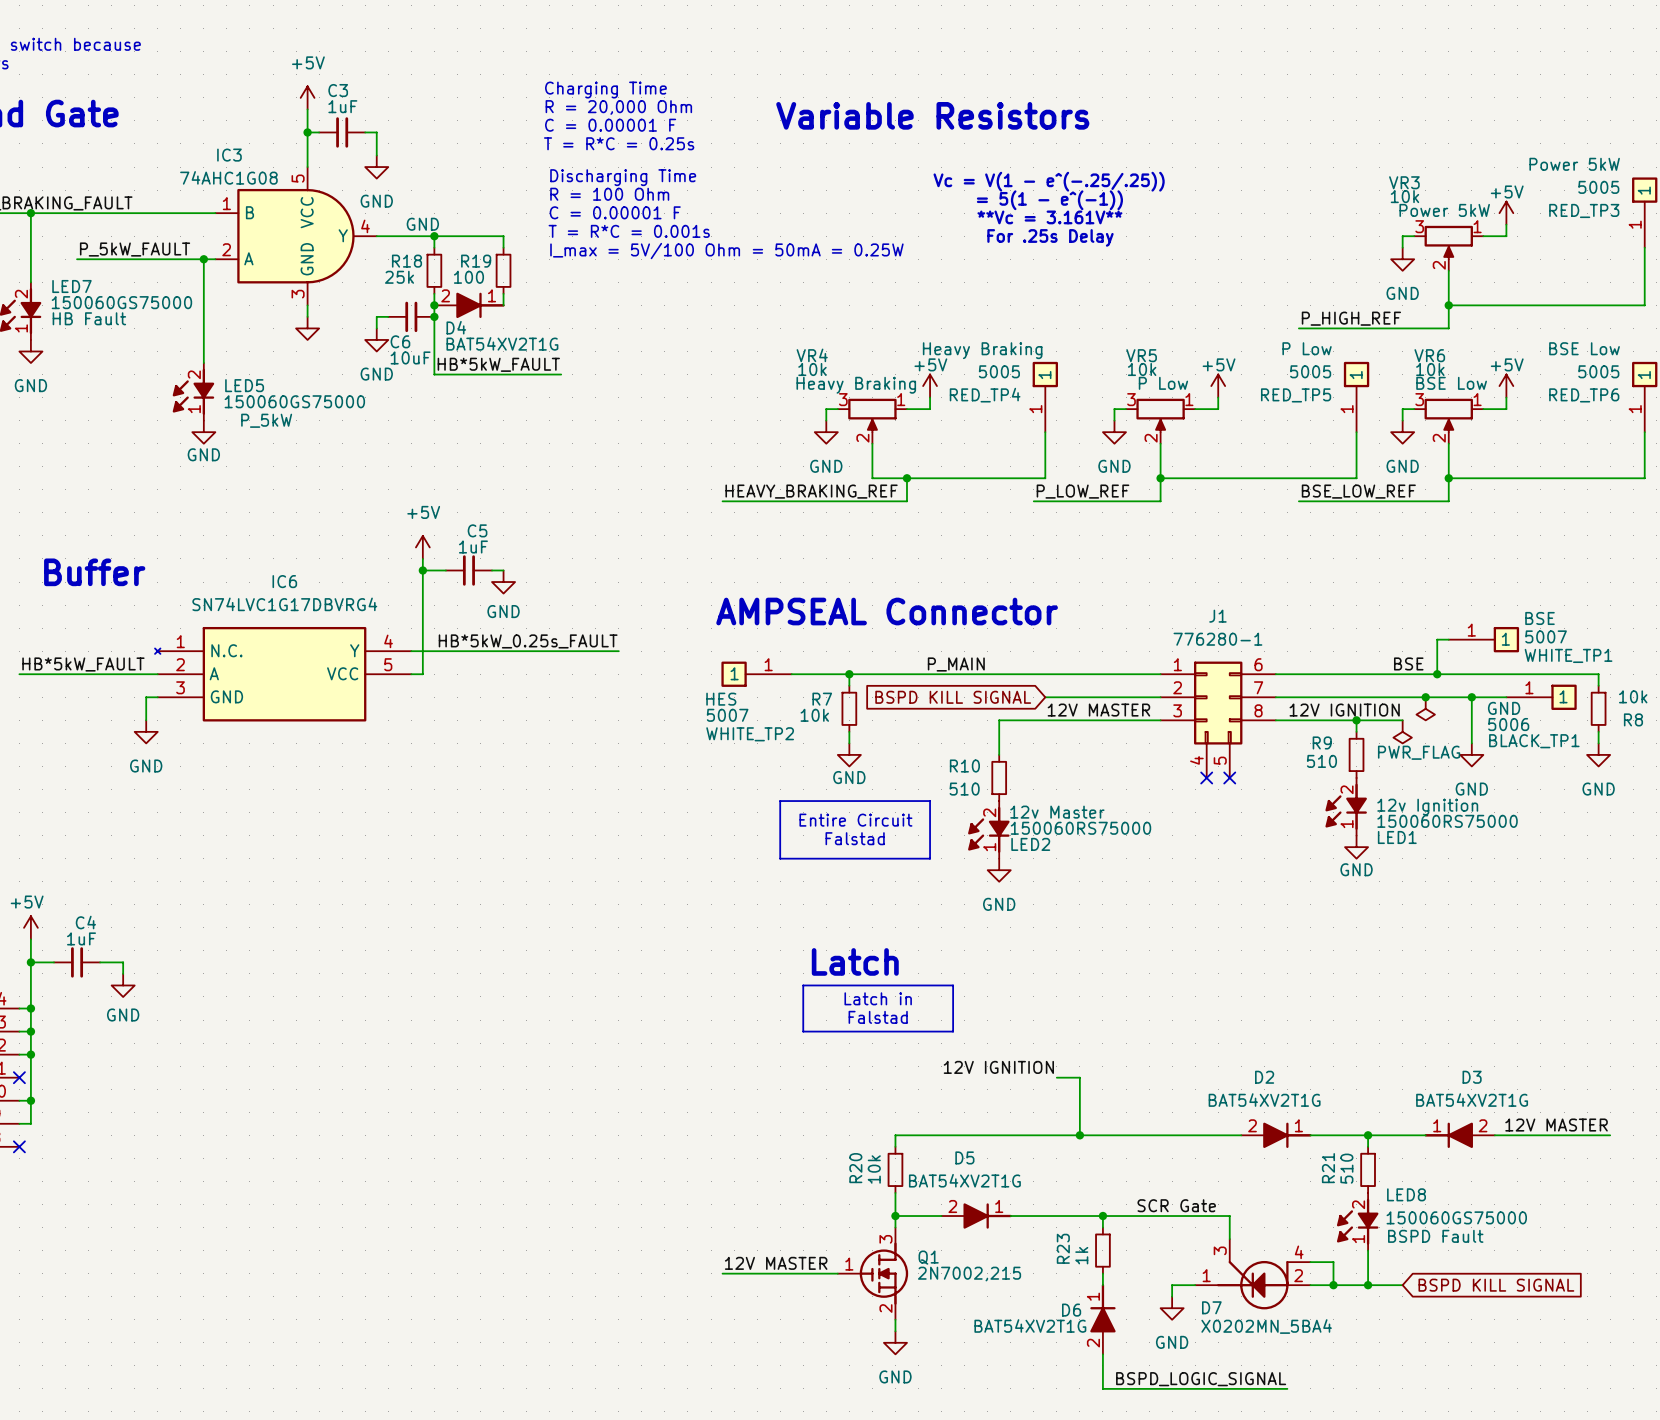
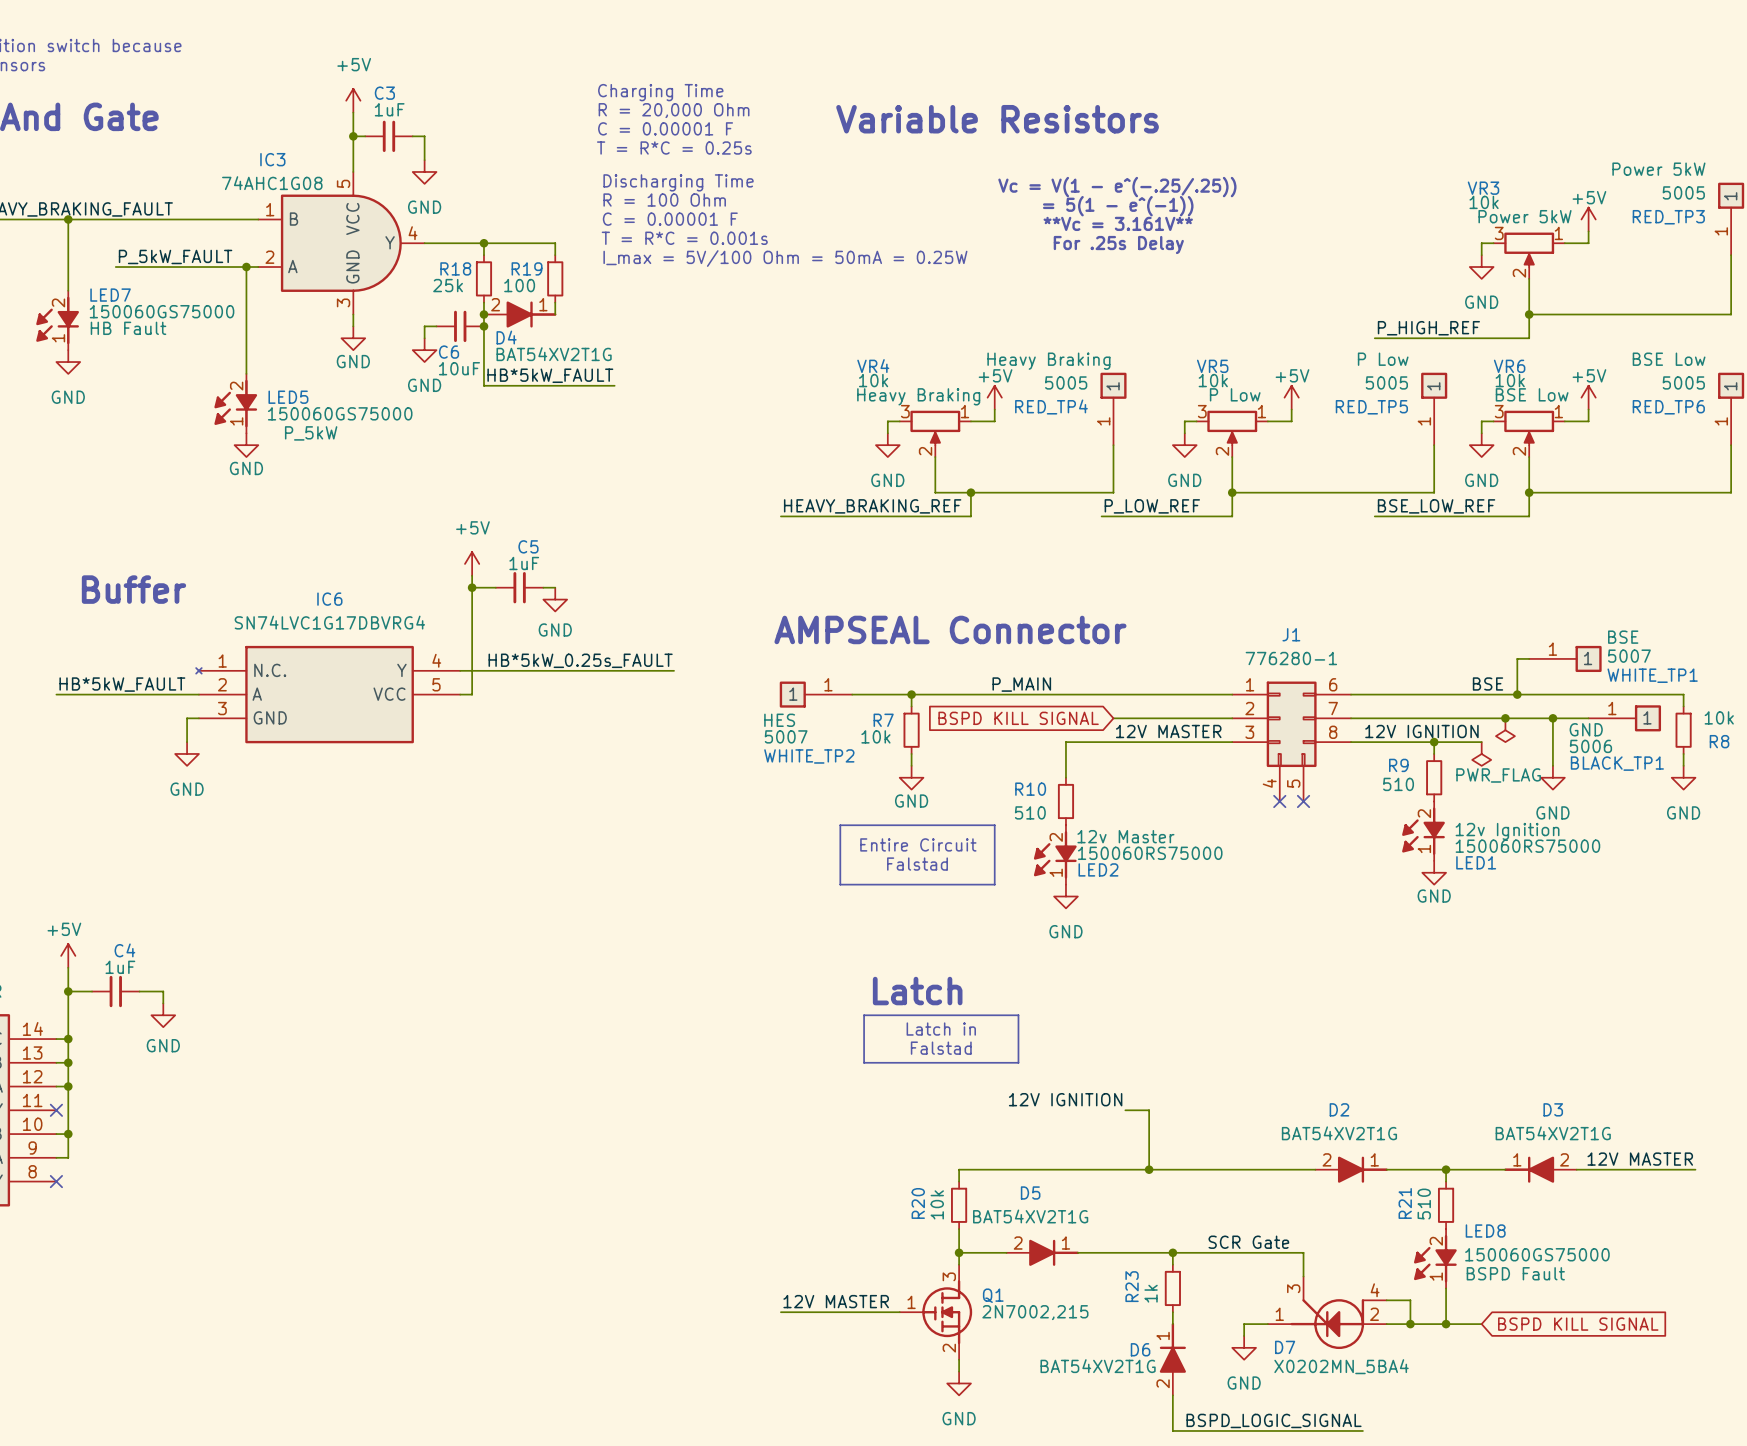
power symbol text position: GND (422, 224) -> GND (353, 361)

